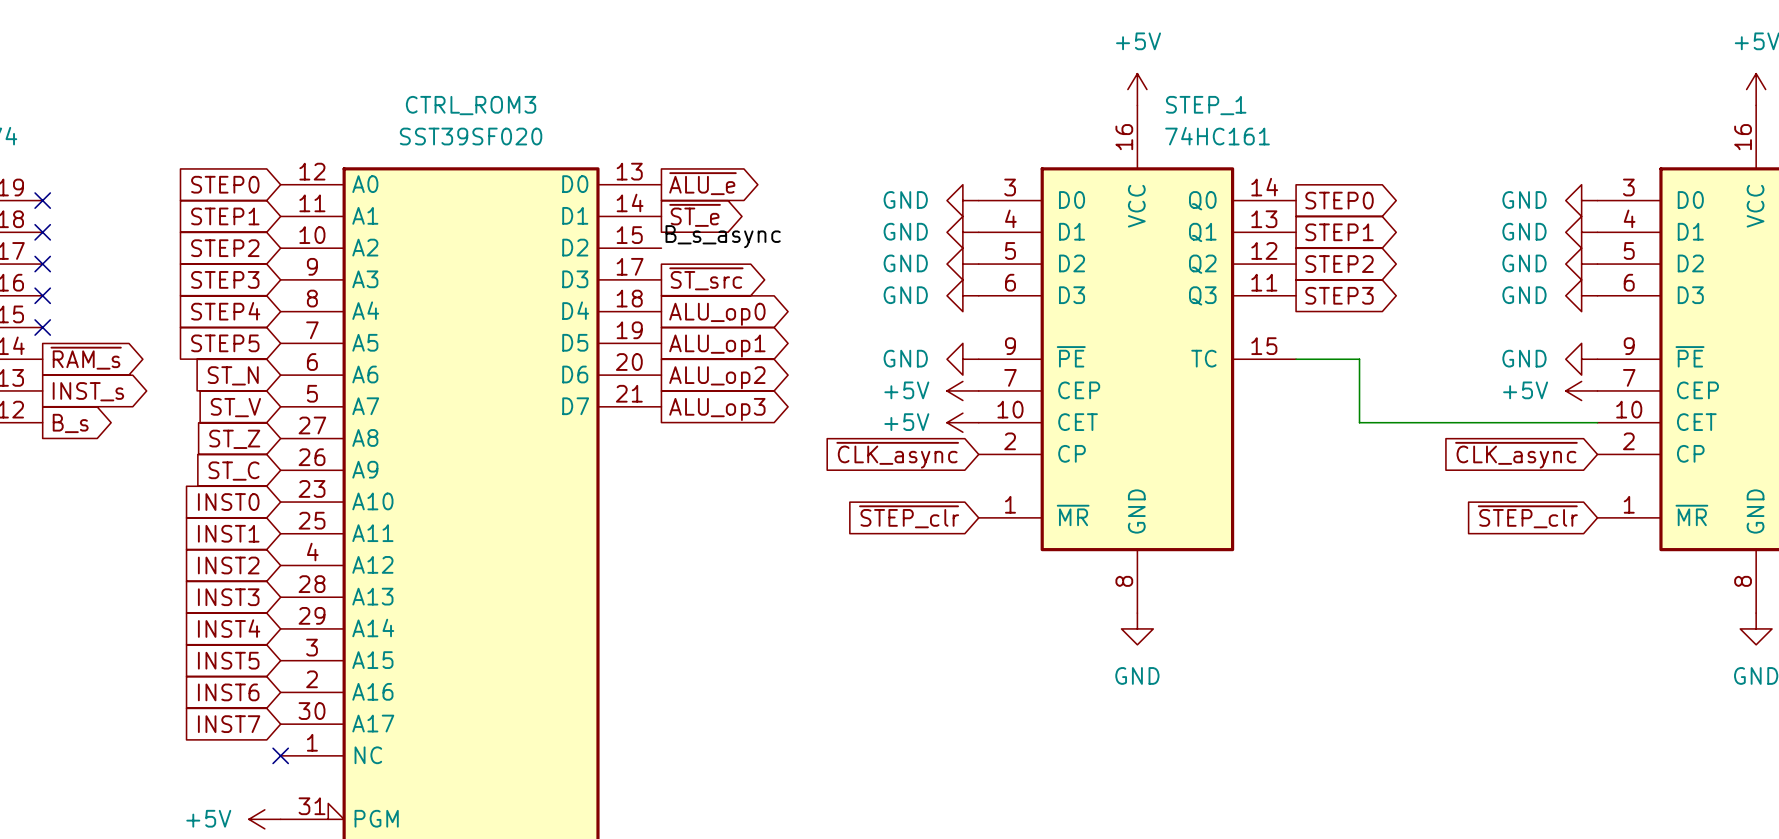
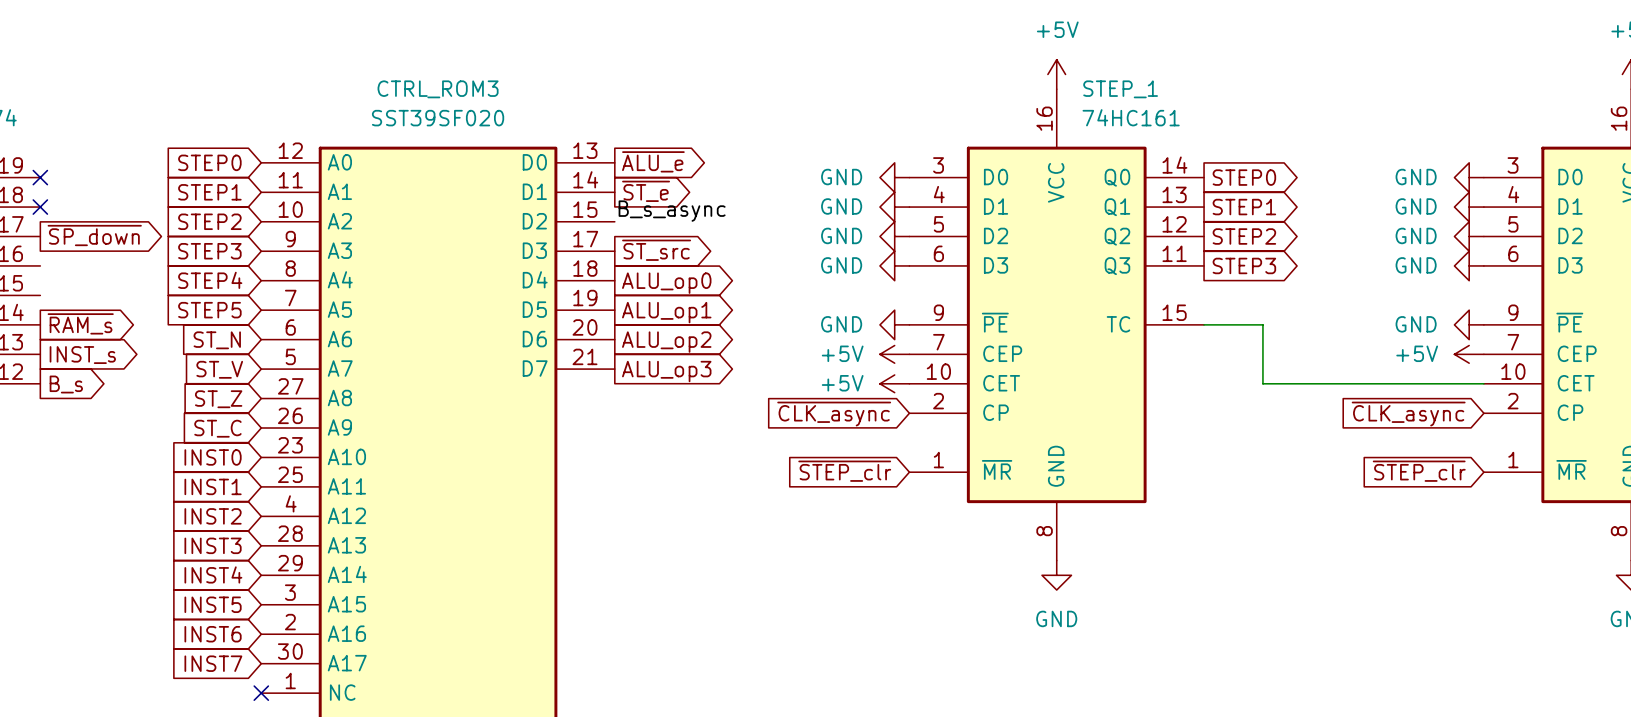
global label: none -> ~{SP_down} (94, 235)
no-connect mark: (42, 264) -> none
no-connect mark: (42, 295) -> none
no-connect mark: (42, 327) -> none

